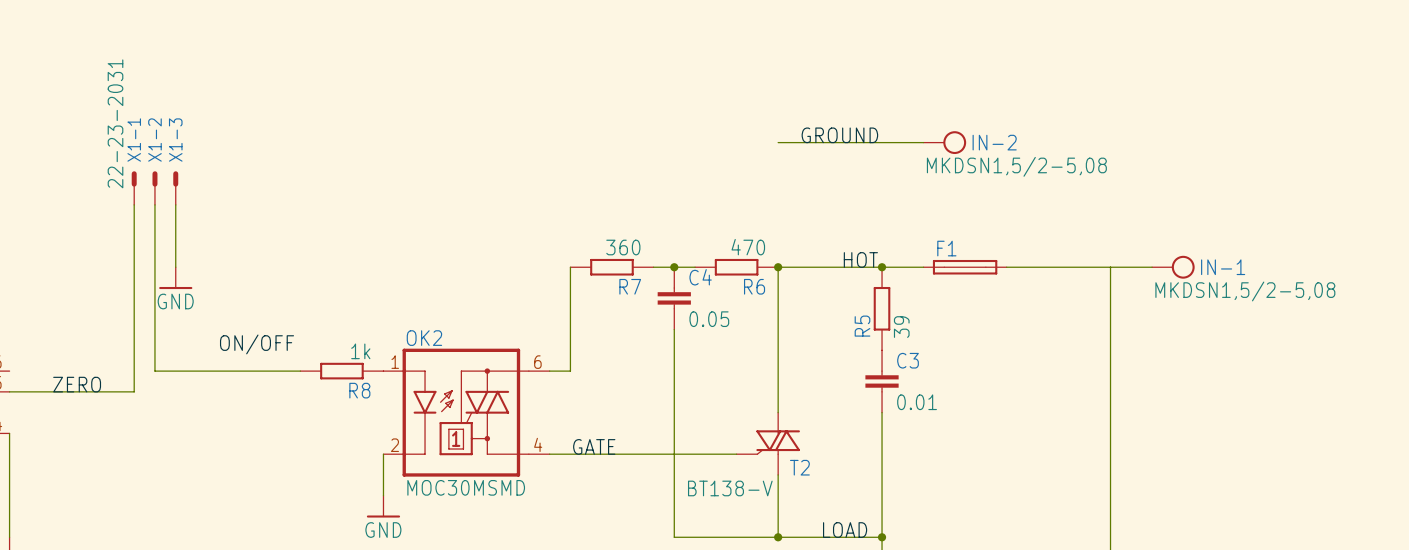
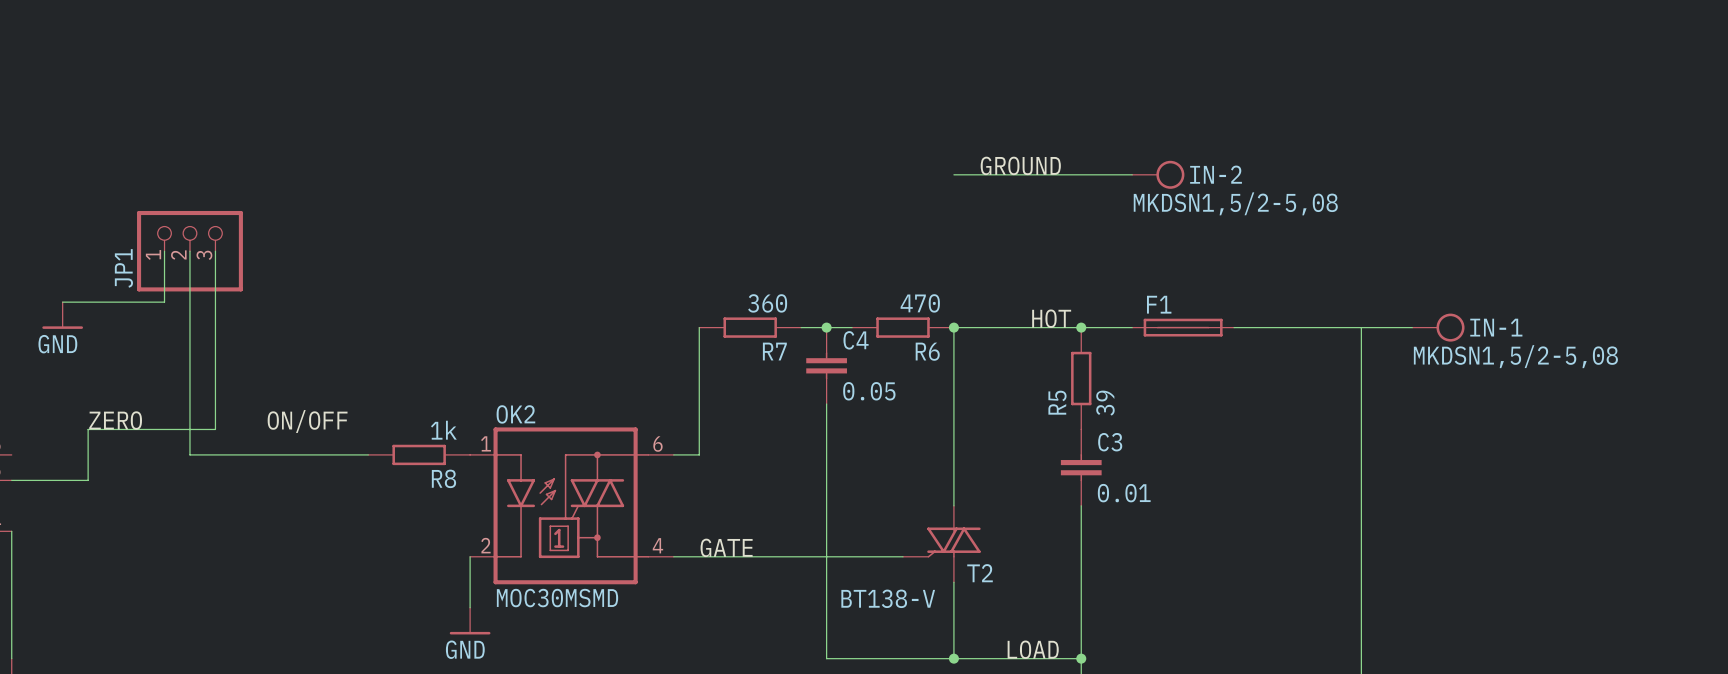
X1-1: 22-23-2031 (134, 188) -> none
X1-2: (154, 188) -> none
X1-3: (175, 188) -> none
JP1: none -> (189, 251)
wire: none -> (62, 302) (164, 302)
wire: (134, 246) (134, 391) (71, 391) -> (215, 327) (215, 429) (88, 429) (88, 480)
power symbol position: GND (175, 278) -> GND (62, 315)
label position: ZERO (77, 384) -> ZERO (115, 420)

